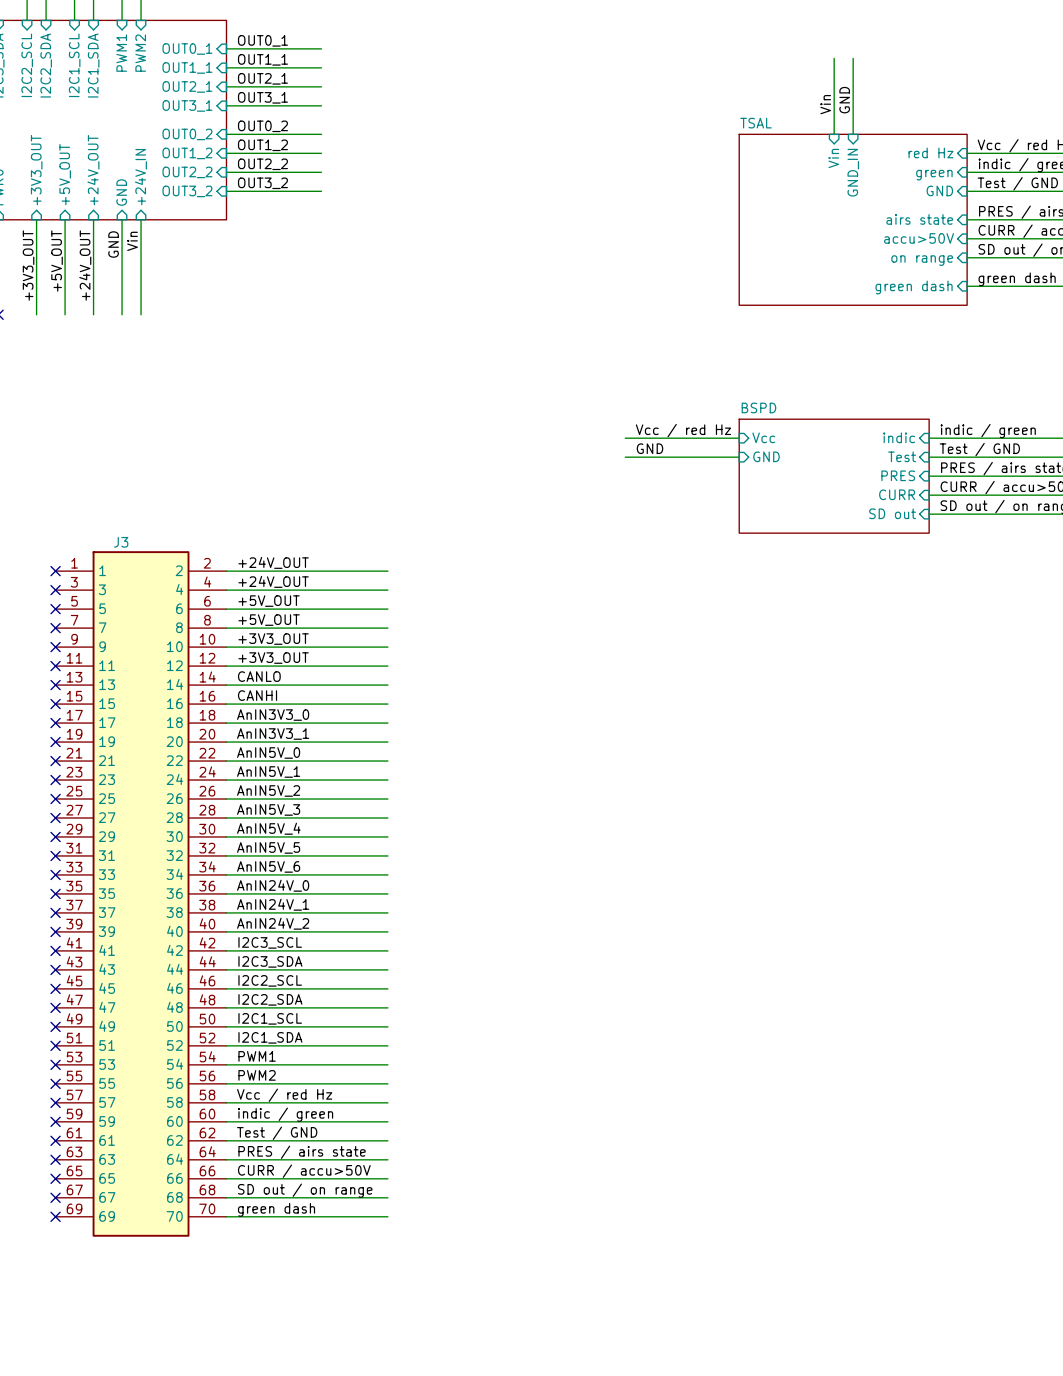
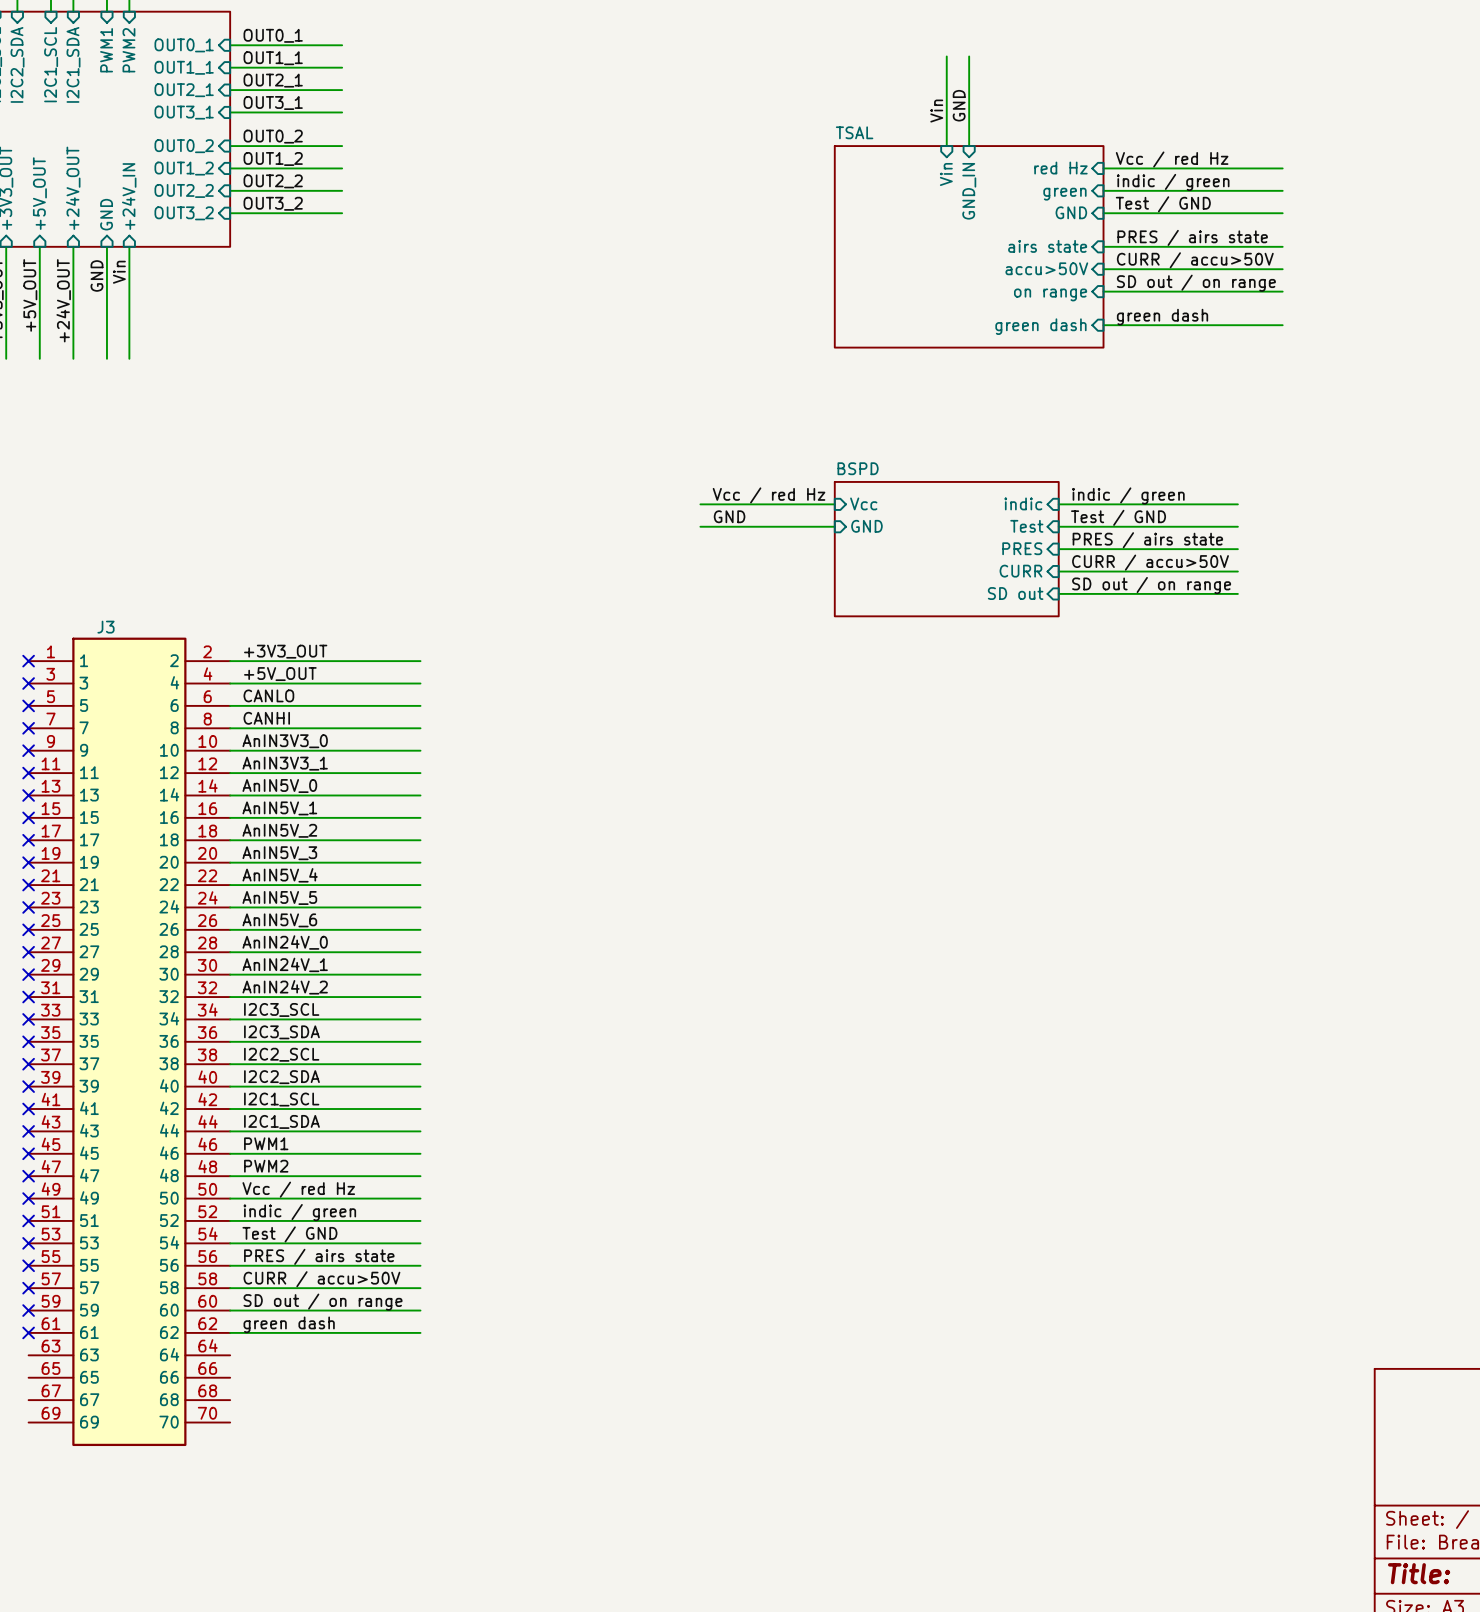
label: +24V_OUT (273, 562) -> +3V3_OUT (285, 651)
label: +24V_OUT (273, 581) -> +5V_OUT (280, 674)
label: +5V_OUT (269, 601) -> CANLO (268, 695)
label: +5V_OUT (269, 620) -> CANHI (266, 718)
label: +3V3_OUT (273, 639) -> AnIN3V3_0 (285, 741)
label: +3V3_OUT (273, 658) -> AnIN3V3_1 (285, 763)
label: CANLO (259, 676) -> AnIN5V_0 (279, 786)
label: CANHI (257, 695) -> AnIN5V_1 (279, 808)
label: AnIN3V3_0 (273, 715) -> AnIN5V_2 (279, 830)
label: AnIN3V3_1 (273, 734) -> AnIN5V_3 (279, 853)
label: AnIN5V_0 (268, 753) -> AnIN5V_4 (280, 875)
label: AnIN5V_1 (268, 771) -> AnIN5V_5 (279, 897)
label: AnIN5V_2 (268, 790) -> AnIN5V_6 (279, 920)
label: AnIN5V_3 (268, 809) -> AnIN24V_0 (285, 942)
label: AnIN5V_4 (268, 828) -> AnIN24V_1 (285, 964)
label: AnIN5V_5 (268, 847) -> AnIN24V_2 (285, 987)
label: AnIN5V_6 (268, 866) -> I2C3_SCL (281, 1009)
label: AnIN24V_0 (273, 885) -> I2C3_SDA (281, 1032)
label: AnIN24V_1 (273, 904) -> I2C2_SCL (281, 1054)
label: AnIN24V_2 (273, 923) -> I2C2_SDA (281, 1077)
label: I2C3_SCL (270, 942) -> I2C1_SCL (281, 1099)
label: I2C3_SDA (270, 961) -> I2C1_SDA (281, 1121)
label: I2C2_SCL (270, 980) -> PWM1 (266, 1143)
label: I2C2_SDA (270, 999) -> PWM2 (266, 1166)
label: I2C1_SCL (270, 1018) -> Vcc / red Hz (298, 1189)
label: I2C1_SDA (270, 1037) -> indic / green (299, 1212)
label: PWM1 (257, 1056) -> Test / GND (289, 1234)
label: PWM2 (257, 1075) -> PRES / airs state (319, 1256)
label: Vcc / red Hz (284, 1095) -> CURR / accu>50V (321, 1279)
label: indic / green (285, 1114) -> SD out / on range (323, 1302)
label: Test / GND (277, 1133) -> green dash (289, 1324)
label: PRES / airs state (302, 1152) -> none
no-connect mark: (55, 1159) -> none
wire: (226, 1159) (387, 1159) -> none
label: CURR / accu>50V (304, 1171) -> none
no-connect mark: (55, 1178) -> none
wire: (226, 1178) (387, 1178) -> none
label: SD out / on range (305, 1190) -> none
no-connect mark: (55, 1197) -> none
wire: (226, 1197) (387, 1197) -> none
label: green dash (276, 1209) -> none
no-connect mark: (55, 1216) -> none
wire: (226, 1216) (387, 1216) -> none

